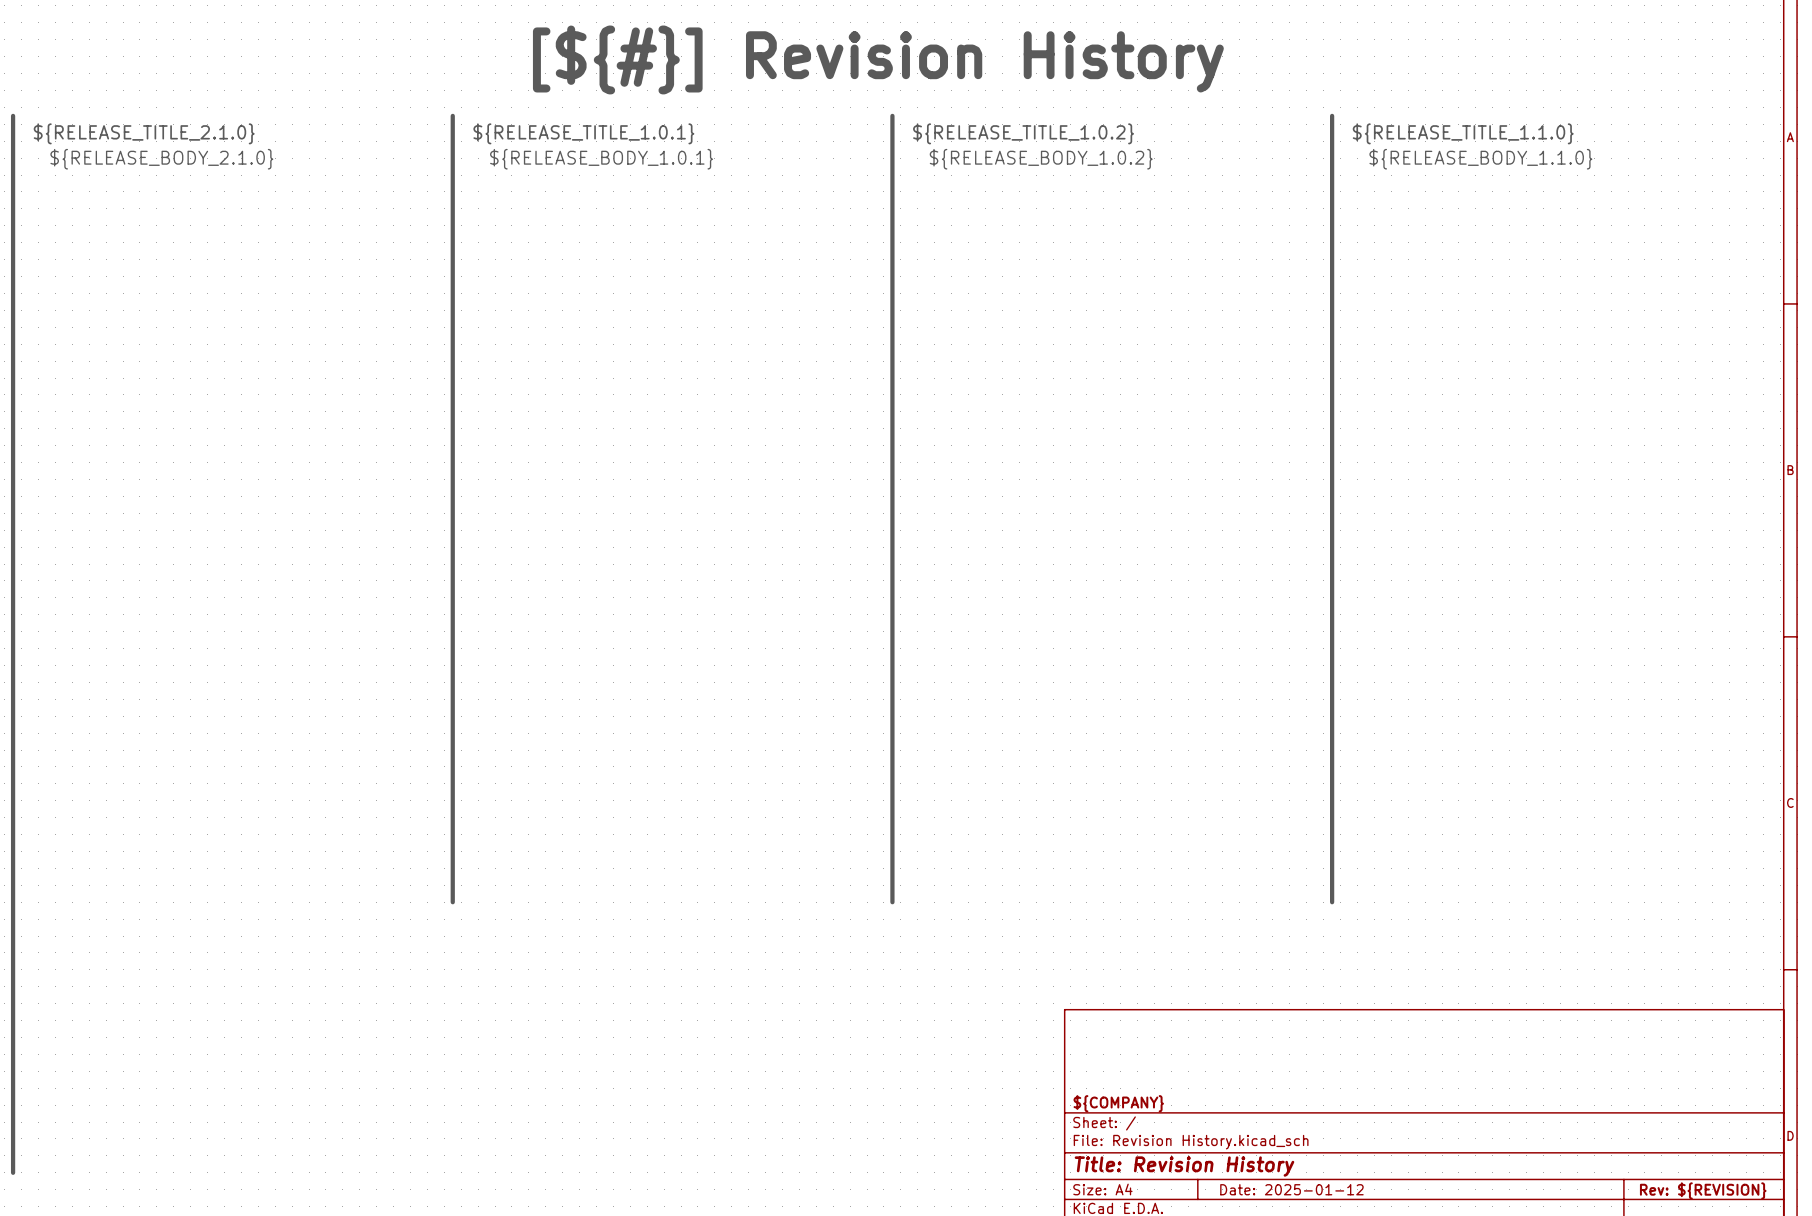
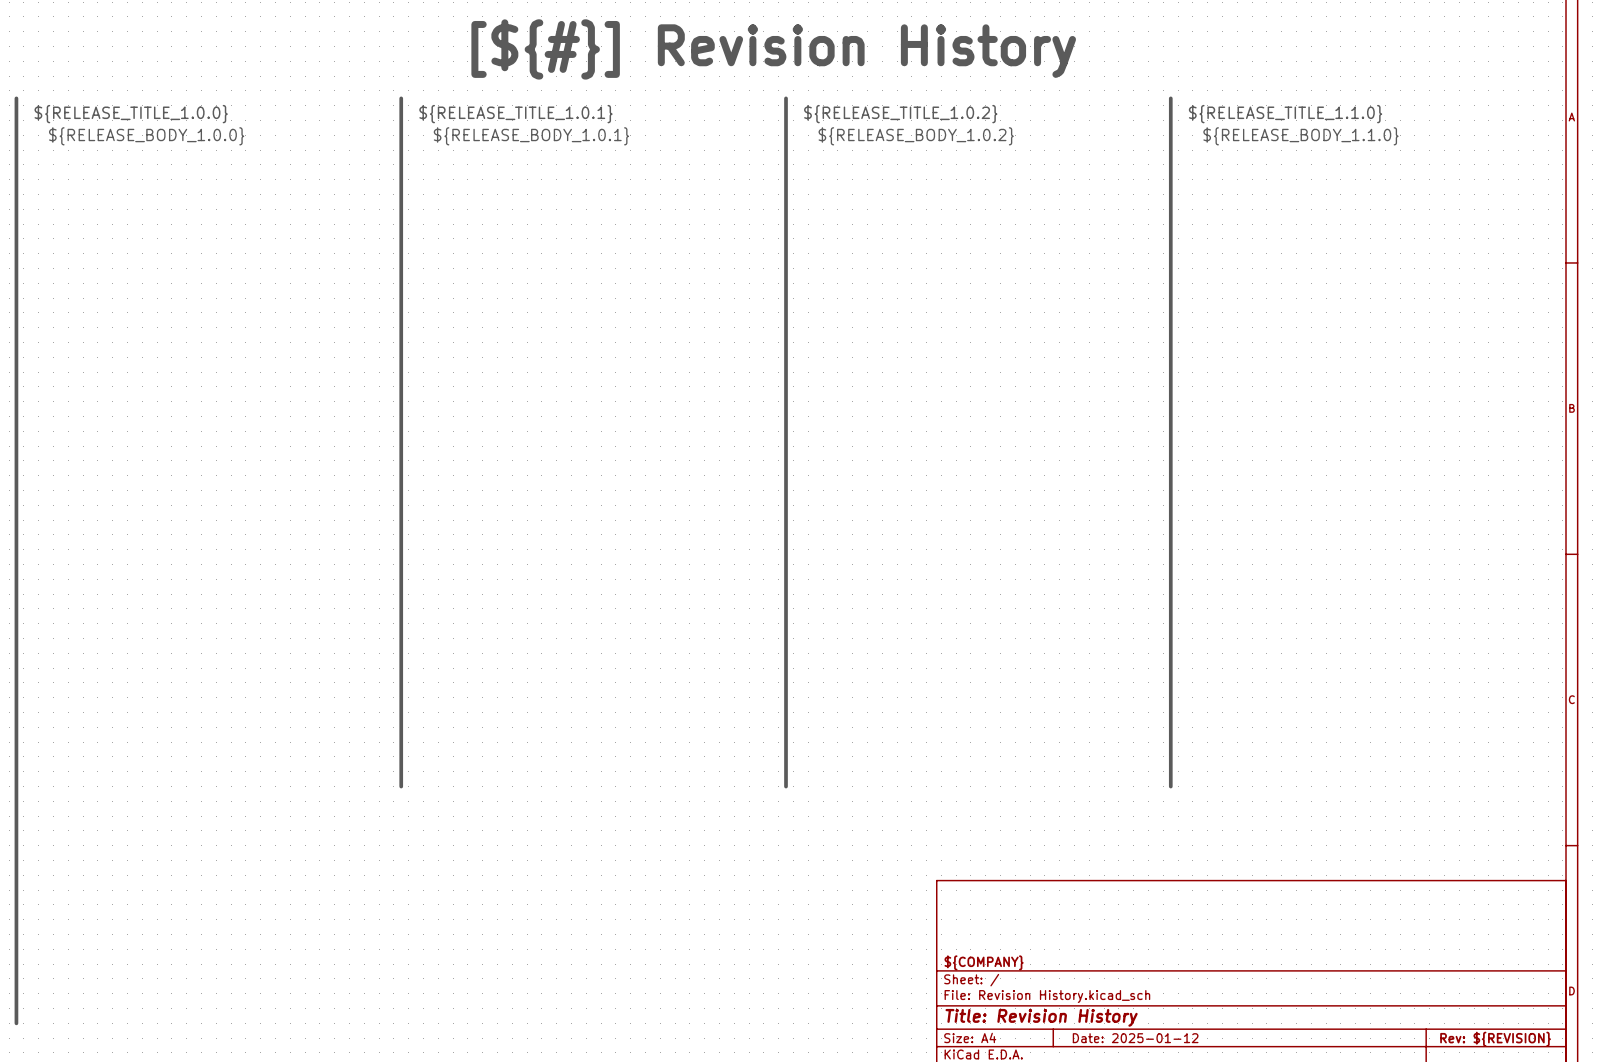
text: ${RELEASE_TITLE_2.1.0} (144, 133) -> ${RELEASE_TITLE_1.0.0} (131, 114)
text: ${RELEASE_BODY_2.1.0} (161, 159) -> ${RELEASE_BODY_1.0.0} (146, 136)

